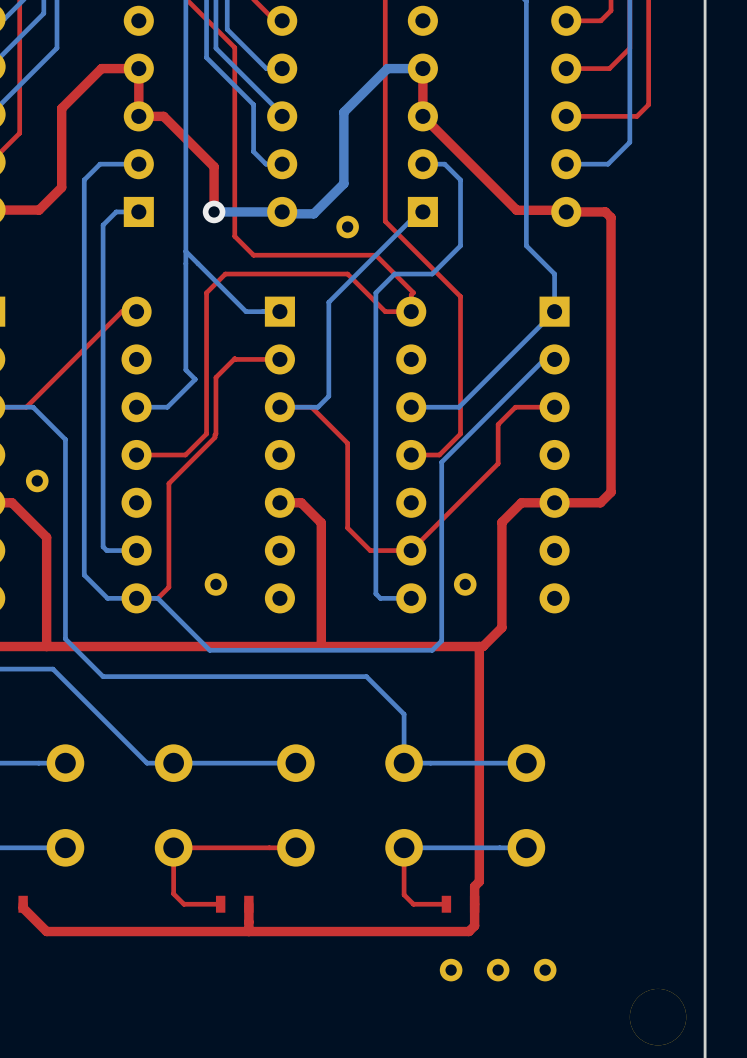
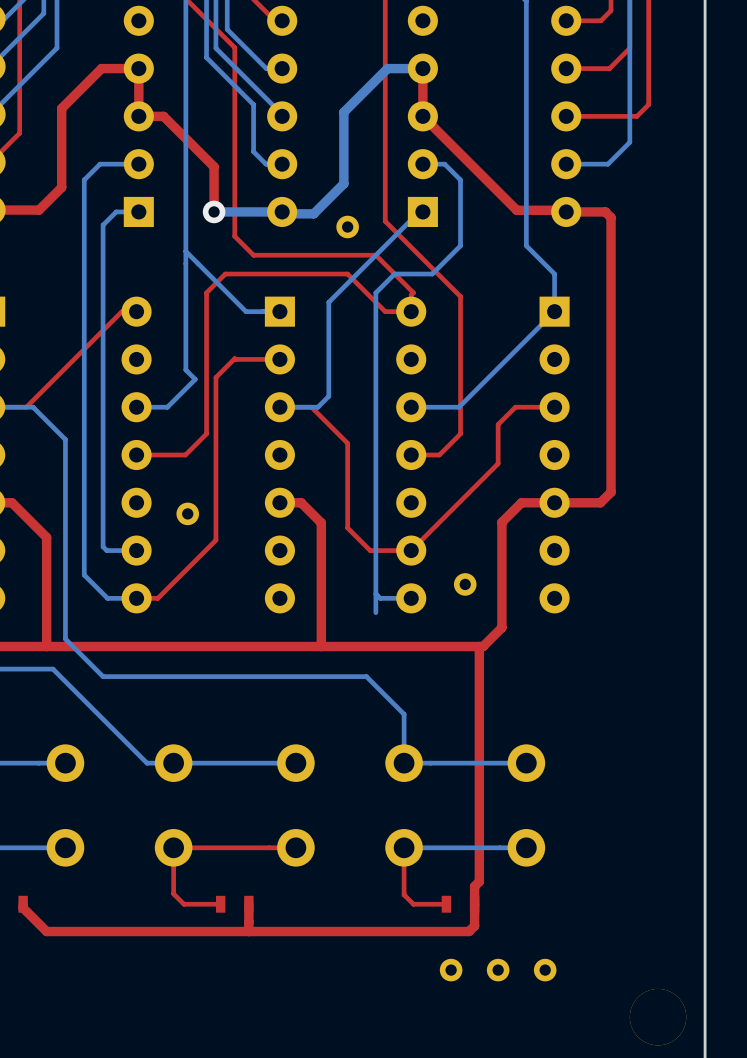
bottom track: (554, 359) (544, 359) (441, 462) (441, 640) (432, 650) (209, 650) (157, 598) (136, 598) -> none
top track: (215, 433) (215, 437) (168, 483) (168, 587) -> (215, 433) (215, 540) (168, 587)
part: (37, 480) -> none
part position: (215, 584) -> (187, 513)
bottom track: none -> (375, 593) (375, 612)

